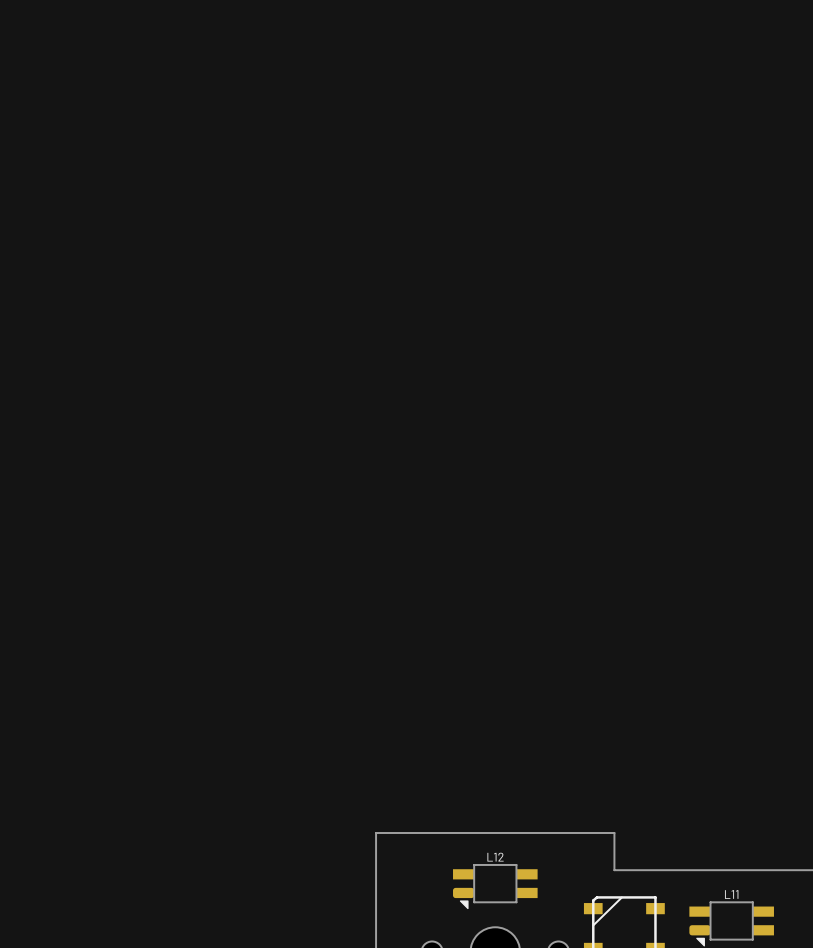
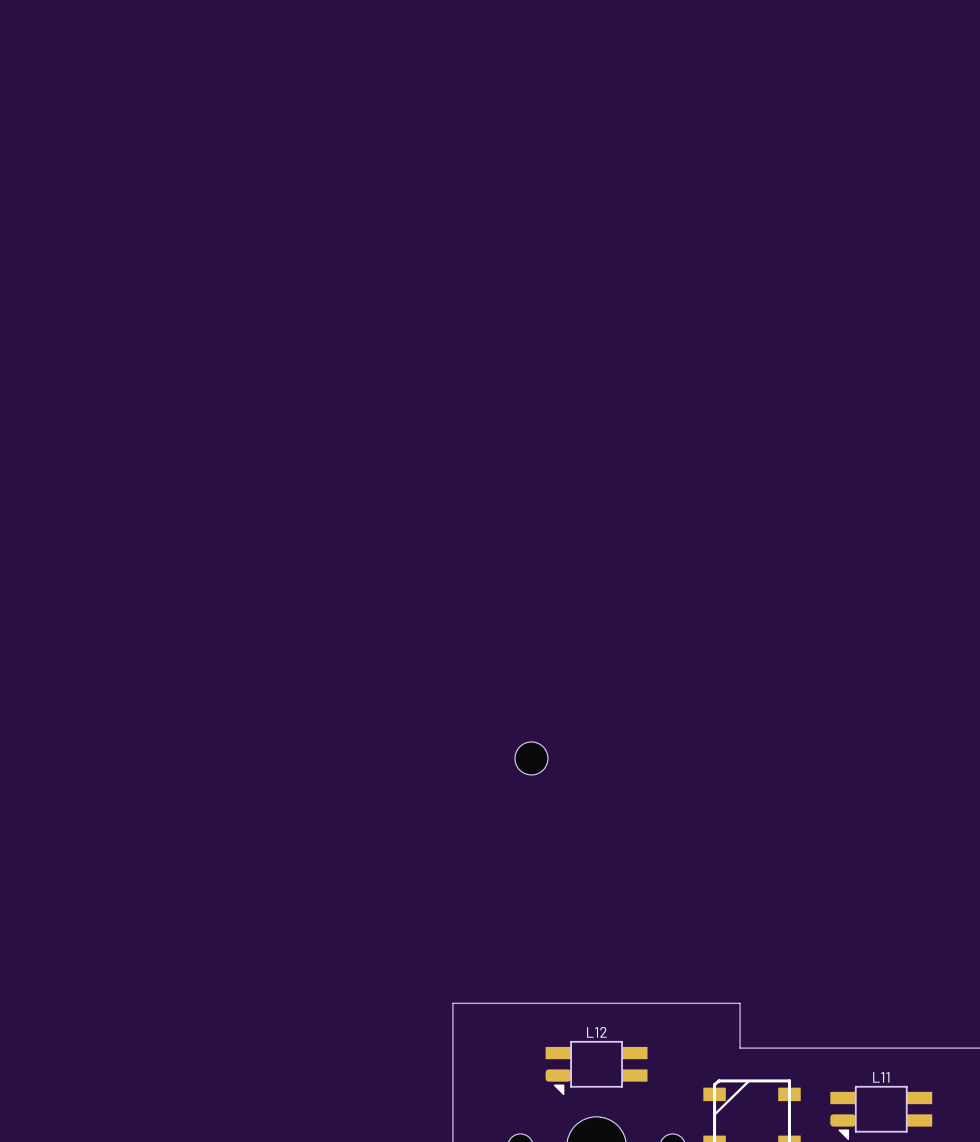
part: none -> (531, 758)

